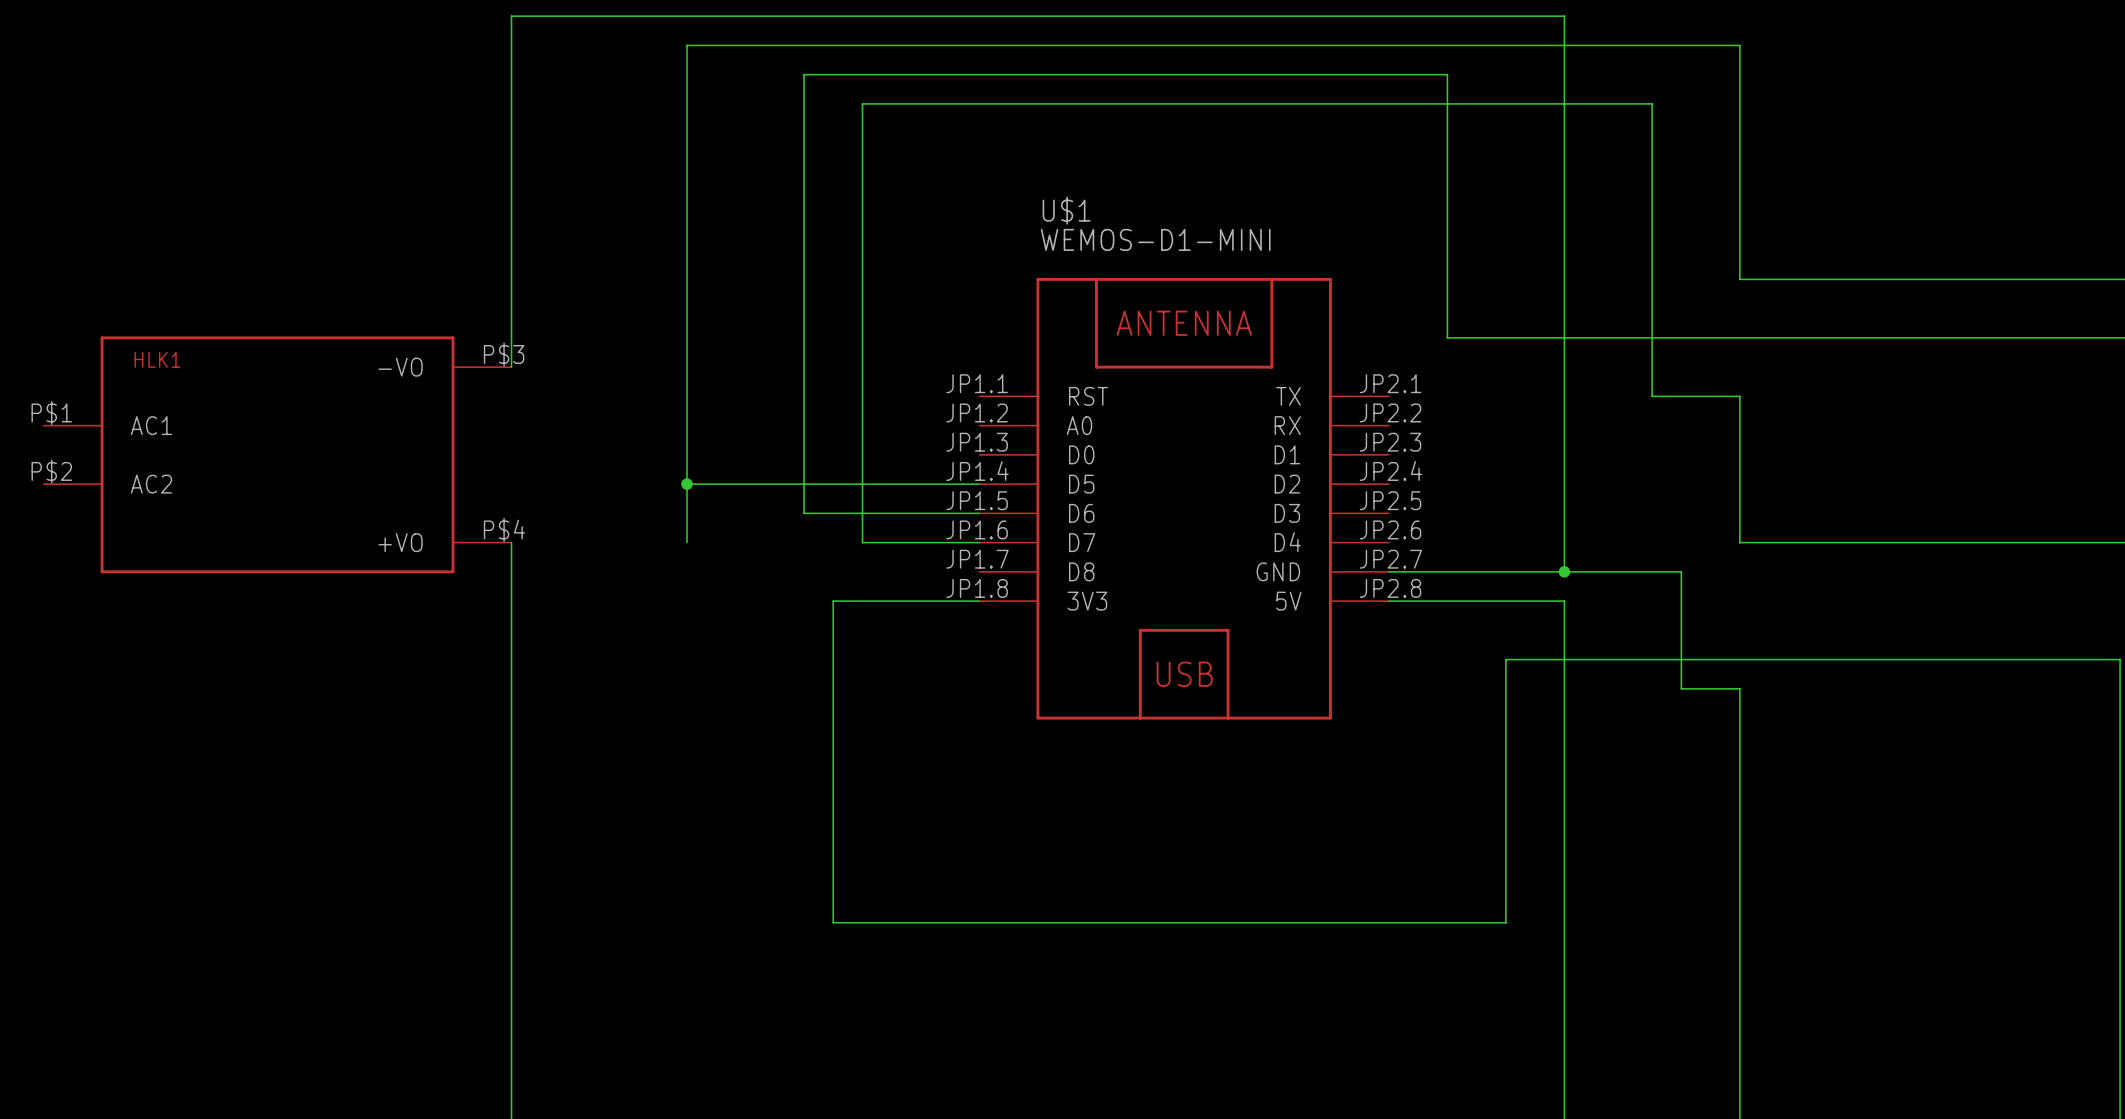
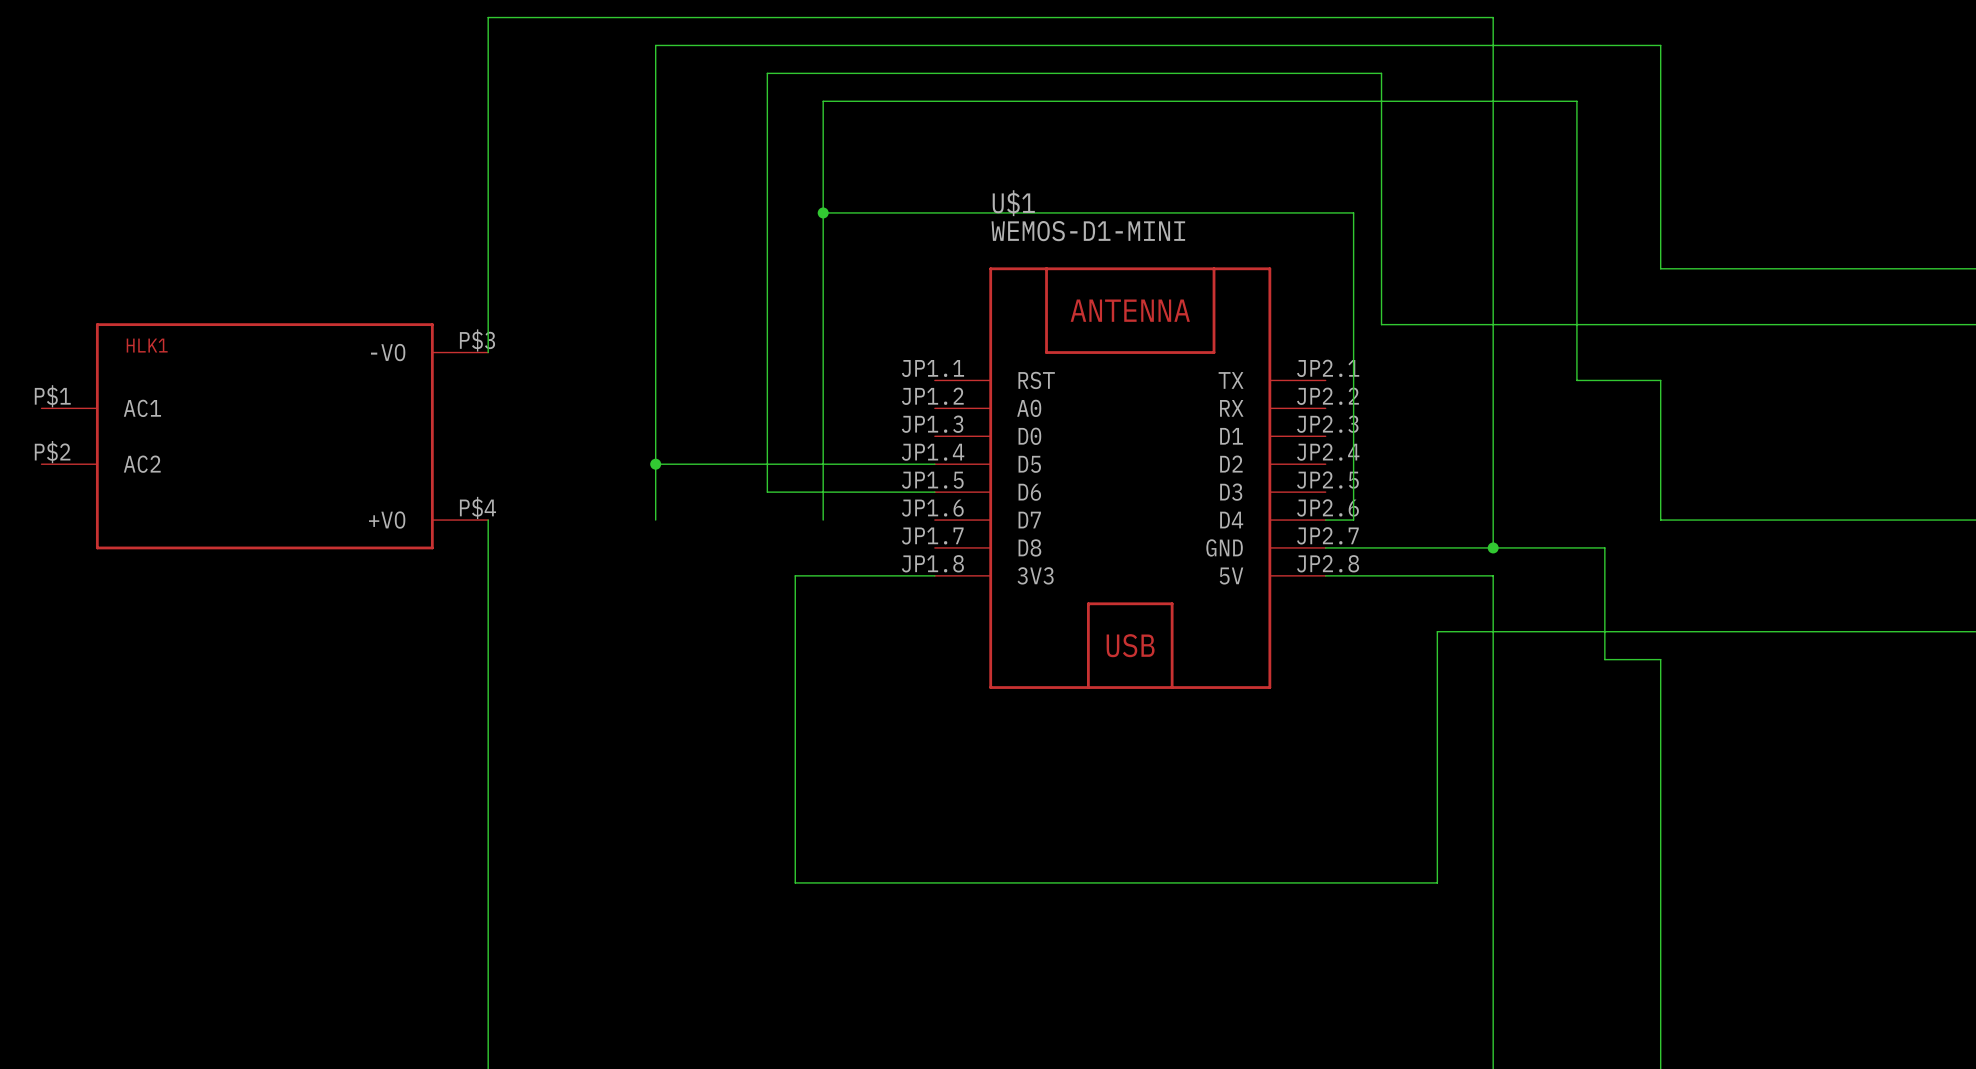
wire: none -> (823, 212) (1353, 212) (1353, 520) (1325, 520)
junction: none -> (823, 212)
wire: (862, 542) (979, 542) -> none

